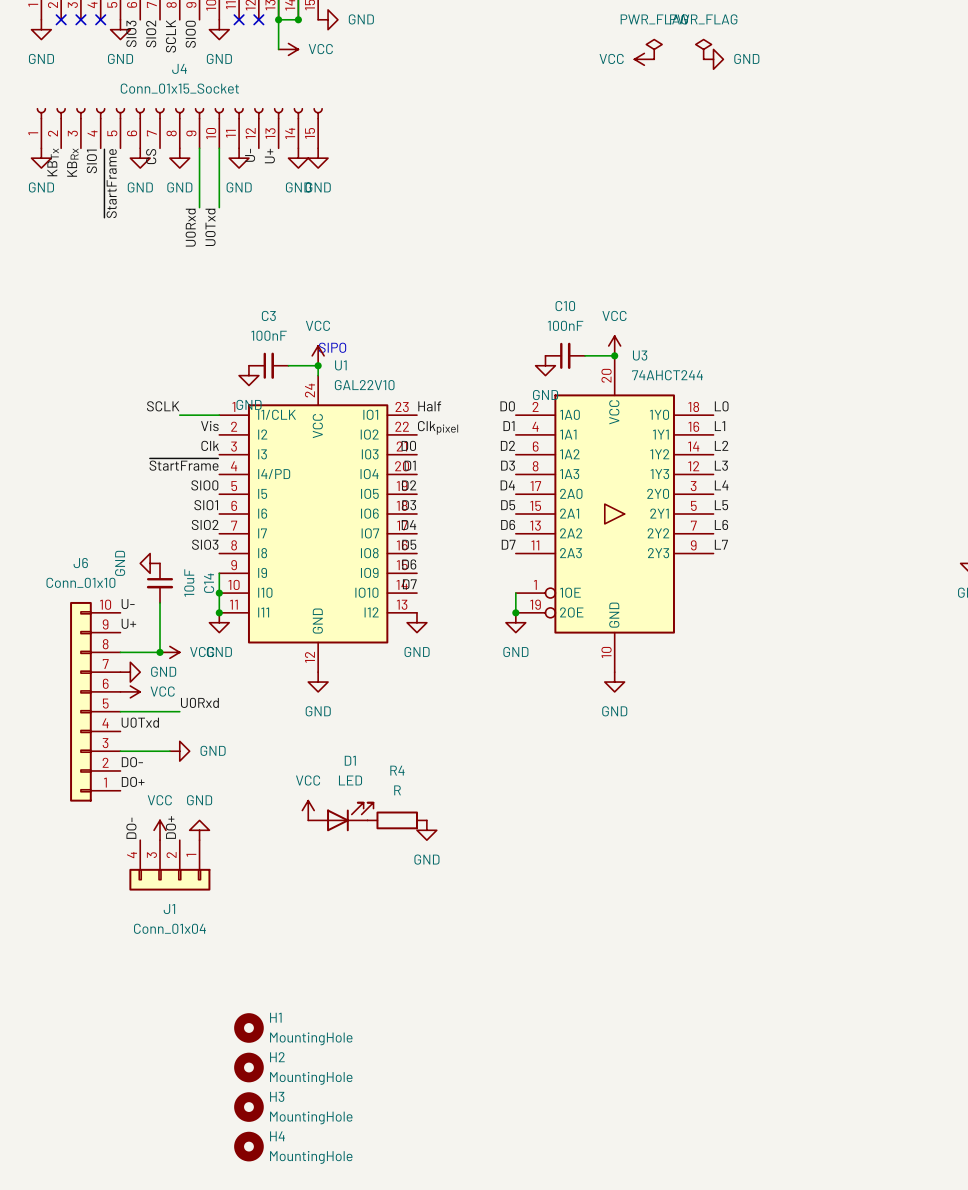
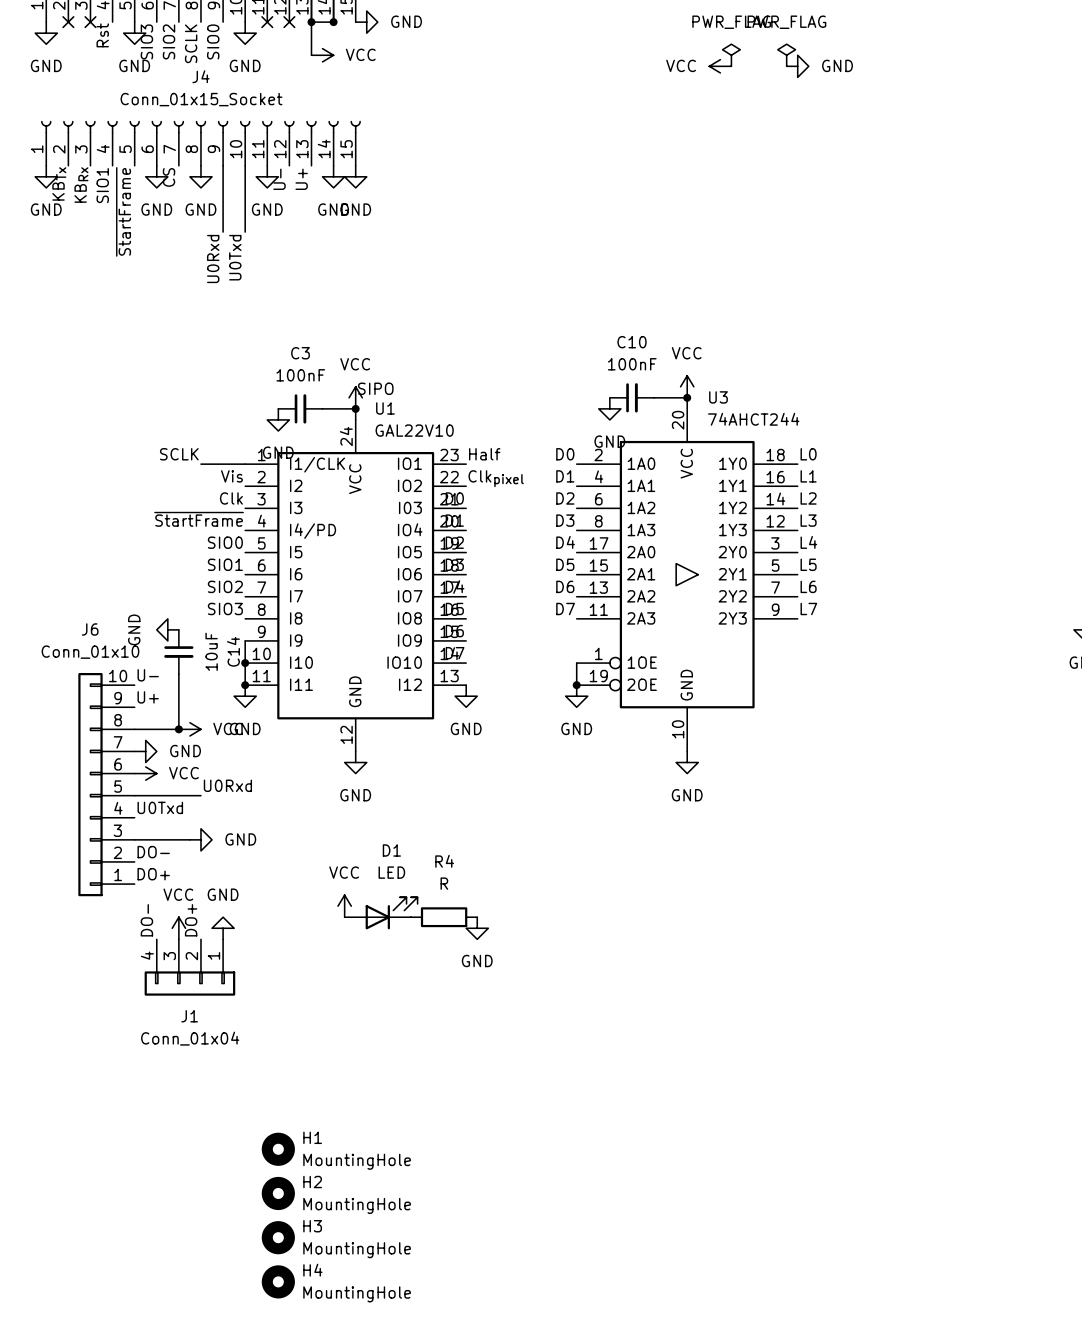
no-connect mark: (100, 19) -> none
label: none -> Rst (102, 35)

